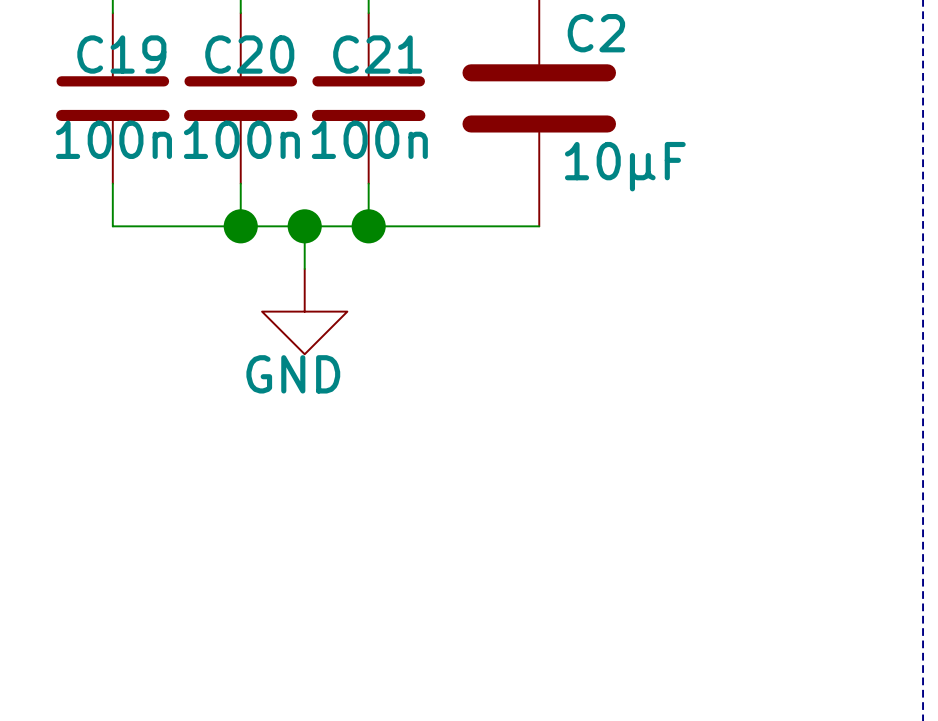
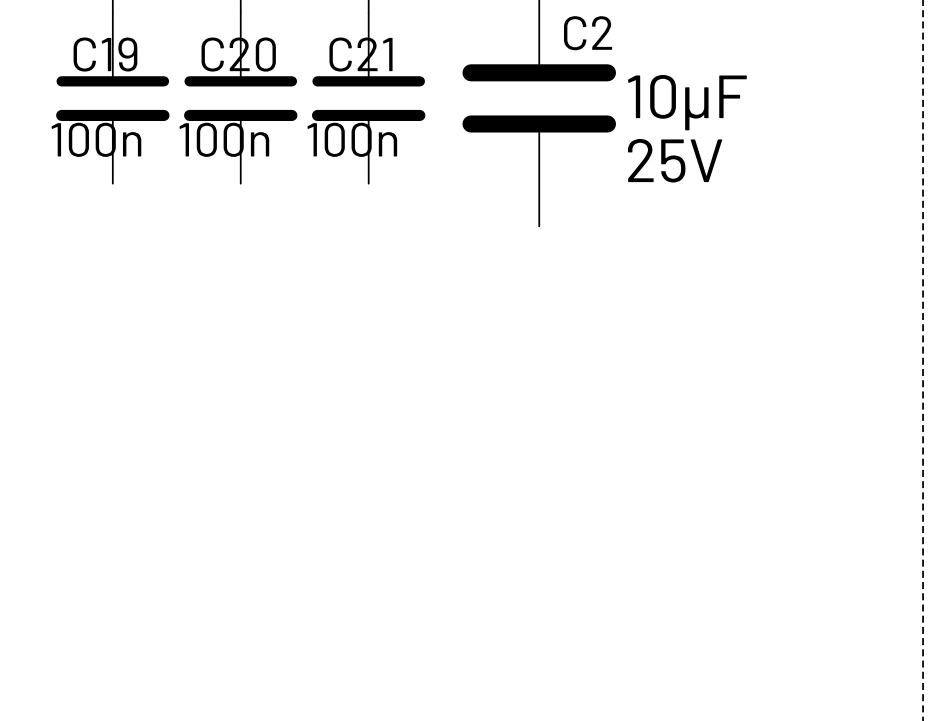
C2 text: none -> 10µF (687, 102)
C2 text: none -> 25V (675, 160)
C2 value: 10µF (625, 166) -> none
wire: (112, 183) (112, 226) (539, 226) -> none
wire: (240, 183) (240, 226) -> none
wire: (368, 183) (368, 226) -> none
junction: (240, 226) -> none
wire: (304, 226) (304, 268) -> none
junction: (304, 226) -> none
junction: (368, 226) -> none
power symbol: GND (304, 311) -> none

